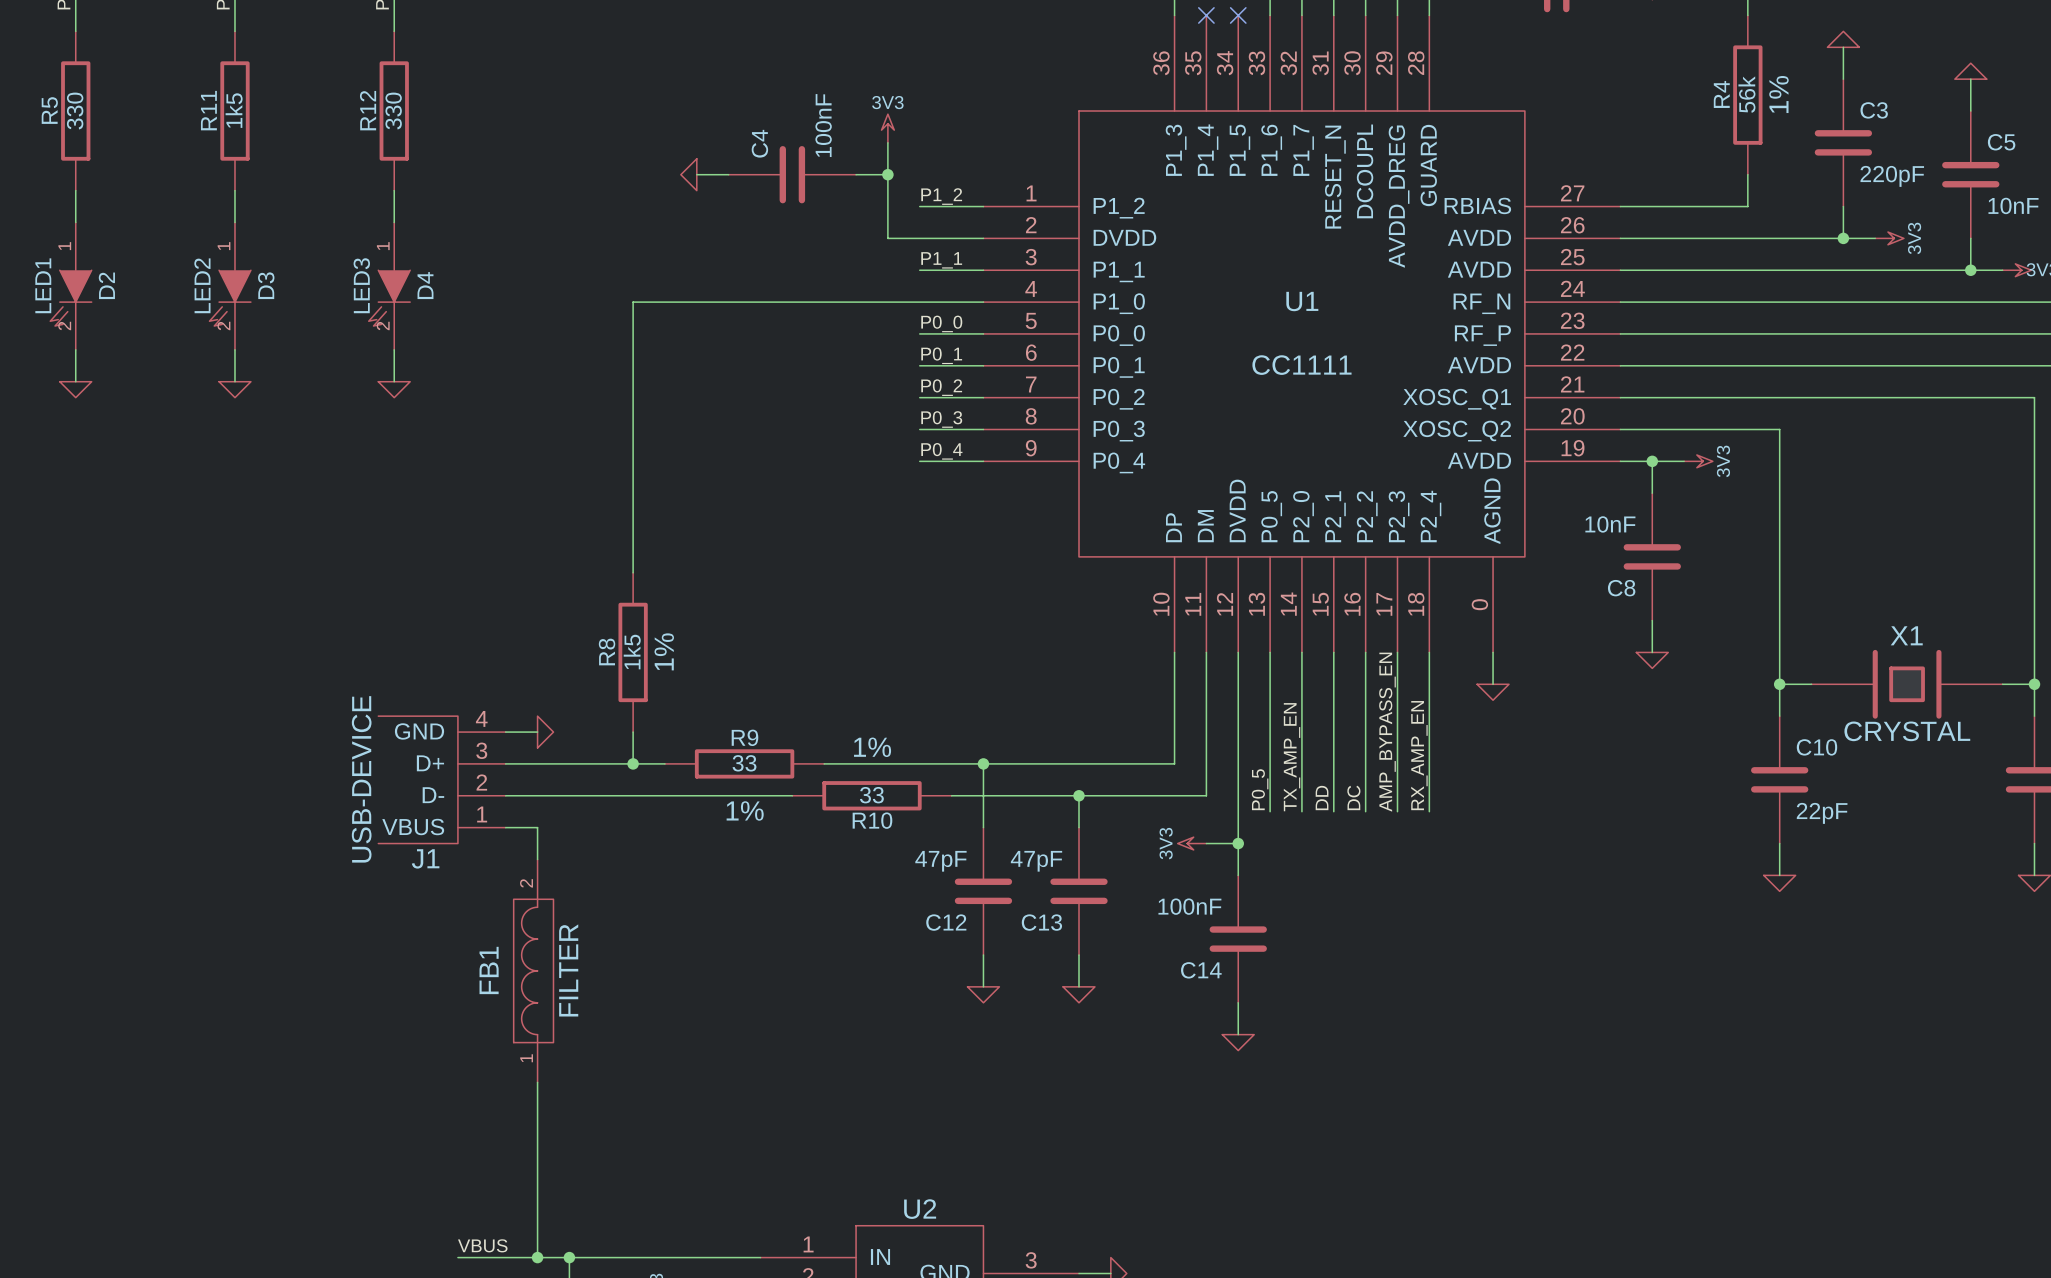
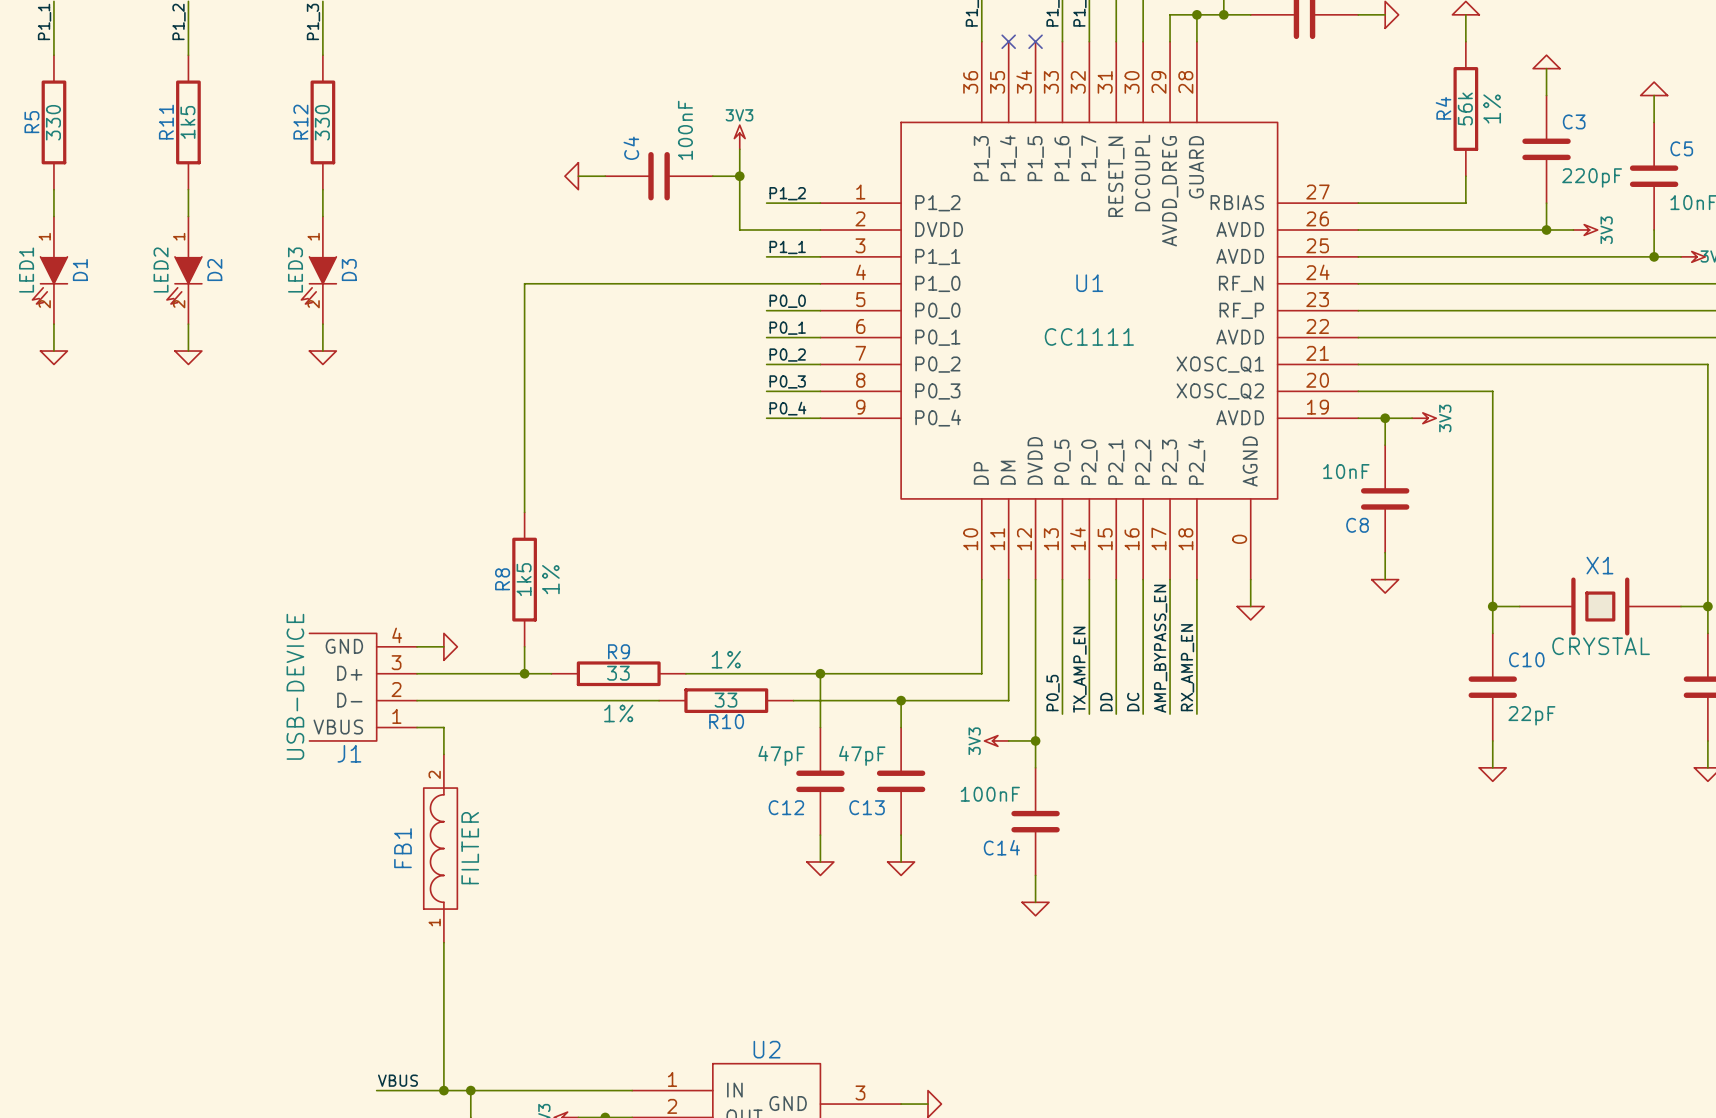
D2 name: D2 (106, 285) -> D1 (80, 270)
D3 name: D3 (266, 285) -> D2 (214, 270)
D4 name: D4 (425, 285) -> D3 (349, 270)

